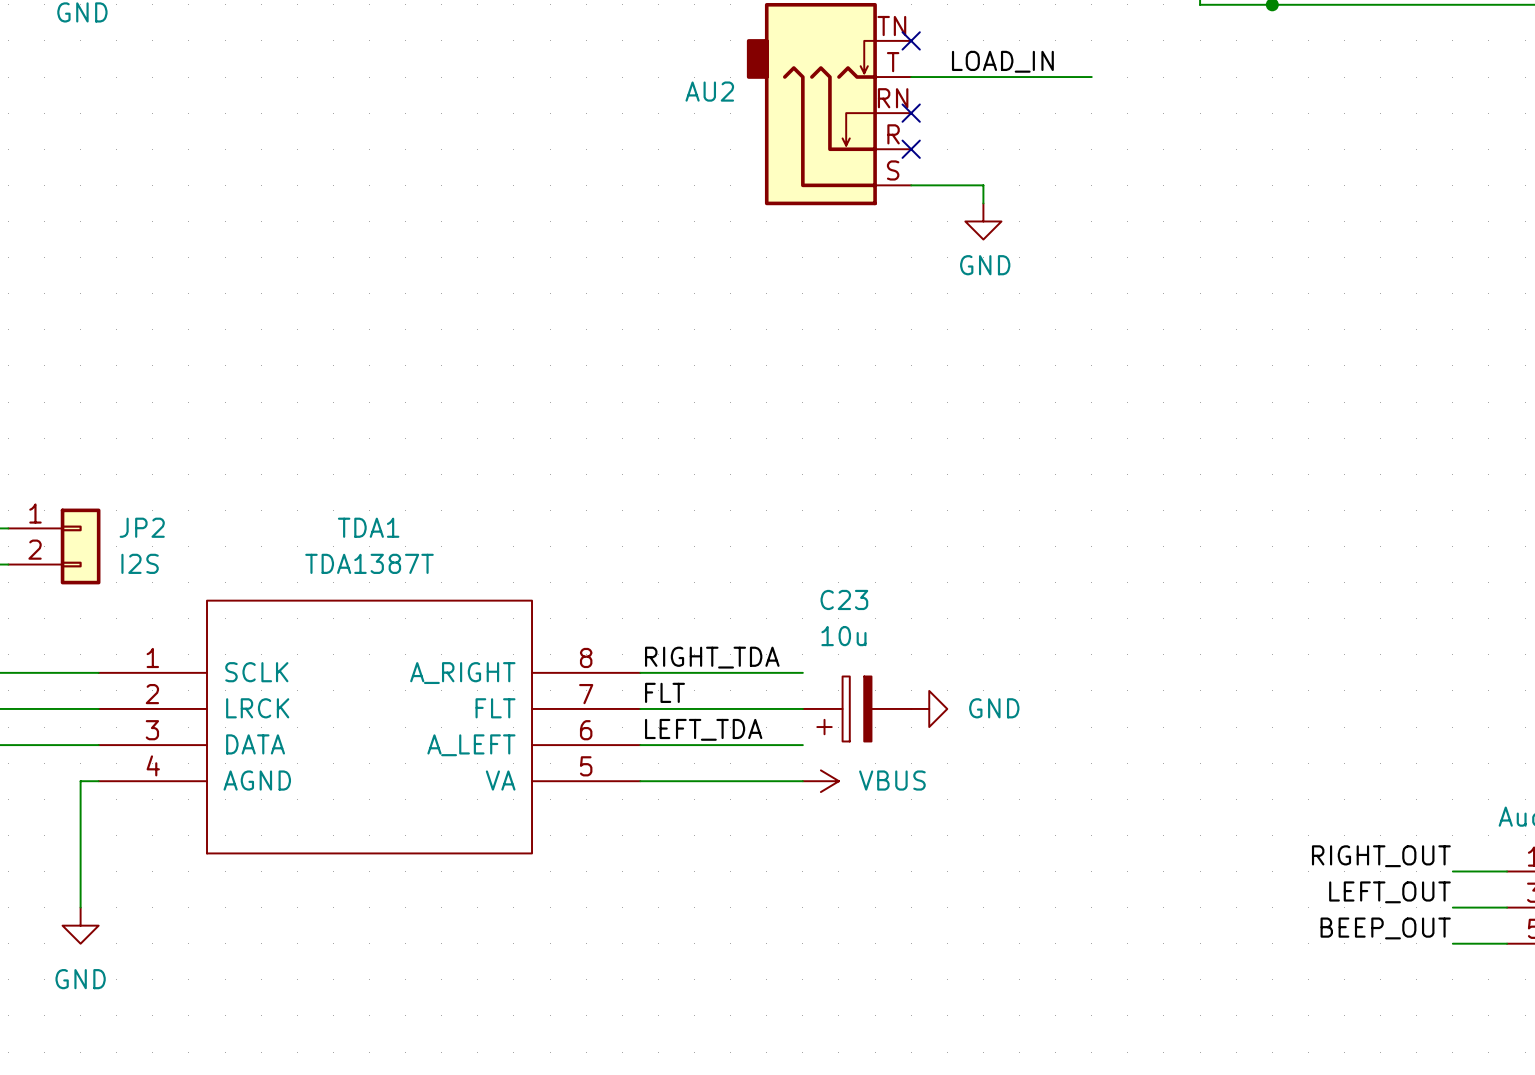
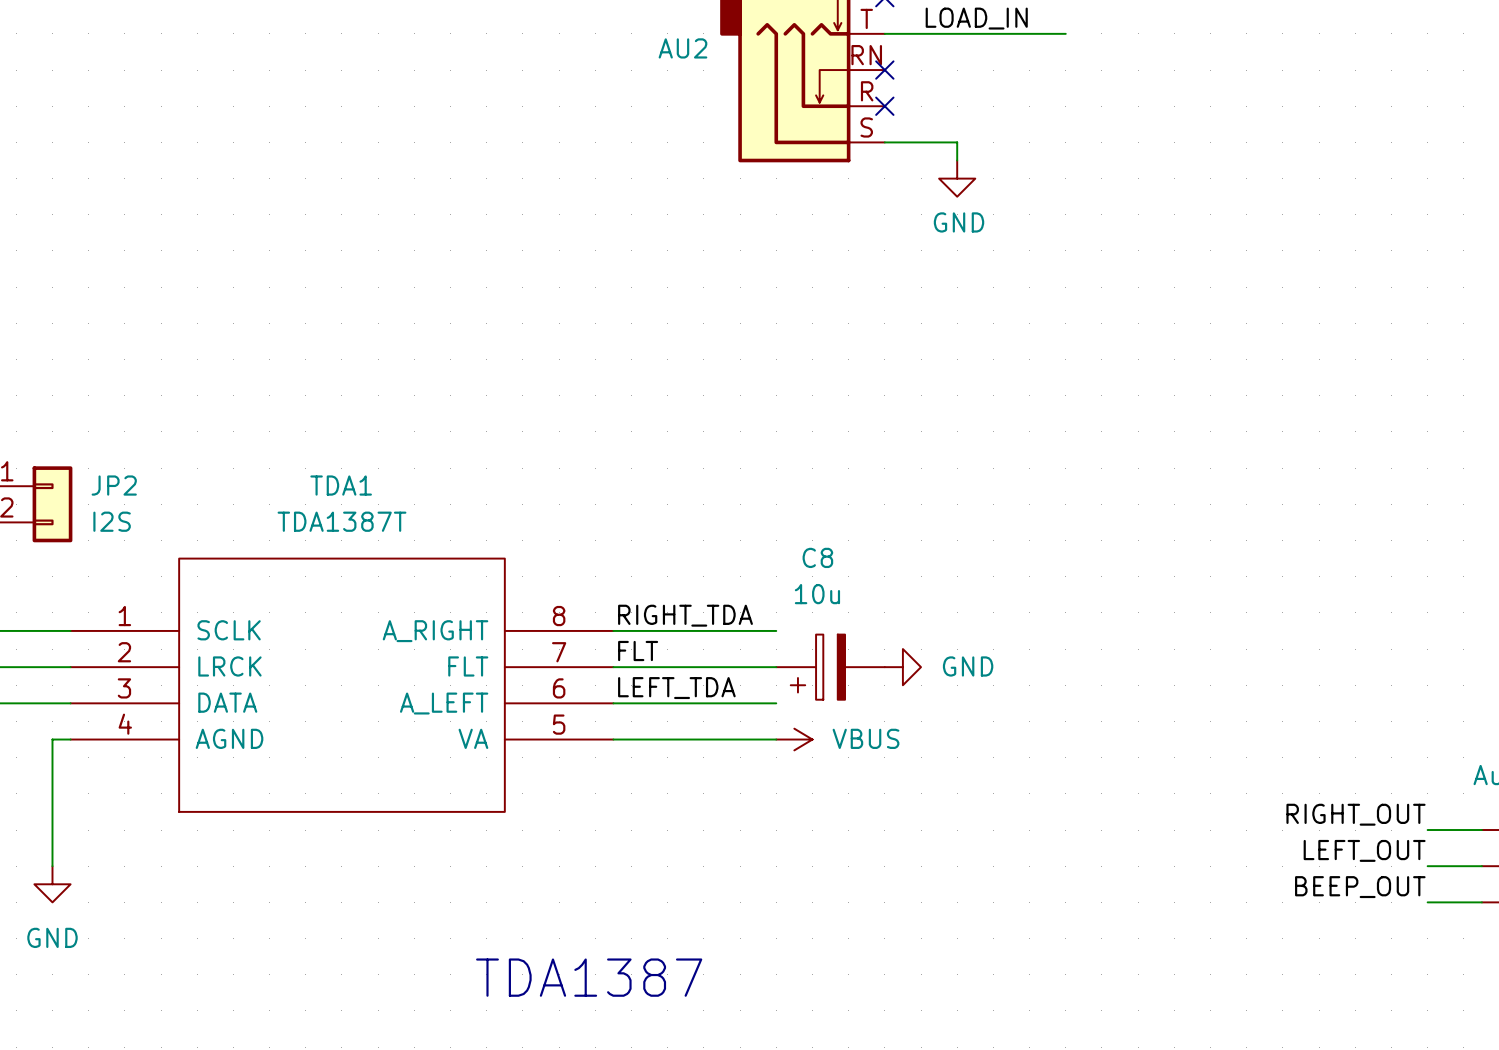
C23 name: C23 (844, 599) -> C8 (817, 557)
text: none -> TDA1387 (589, 977)

